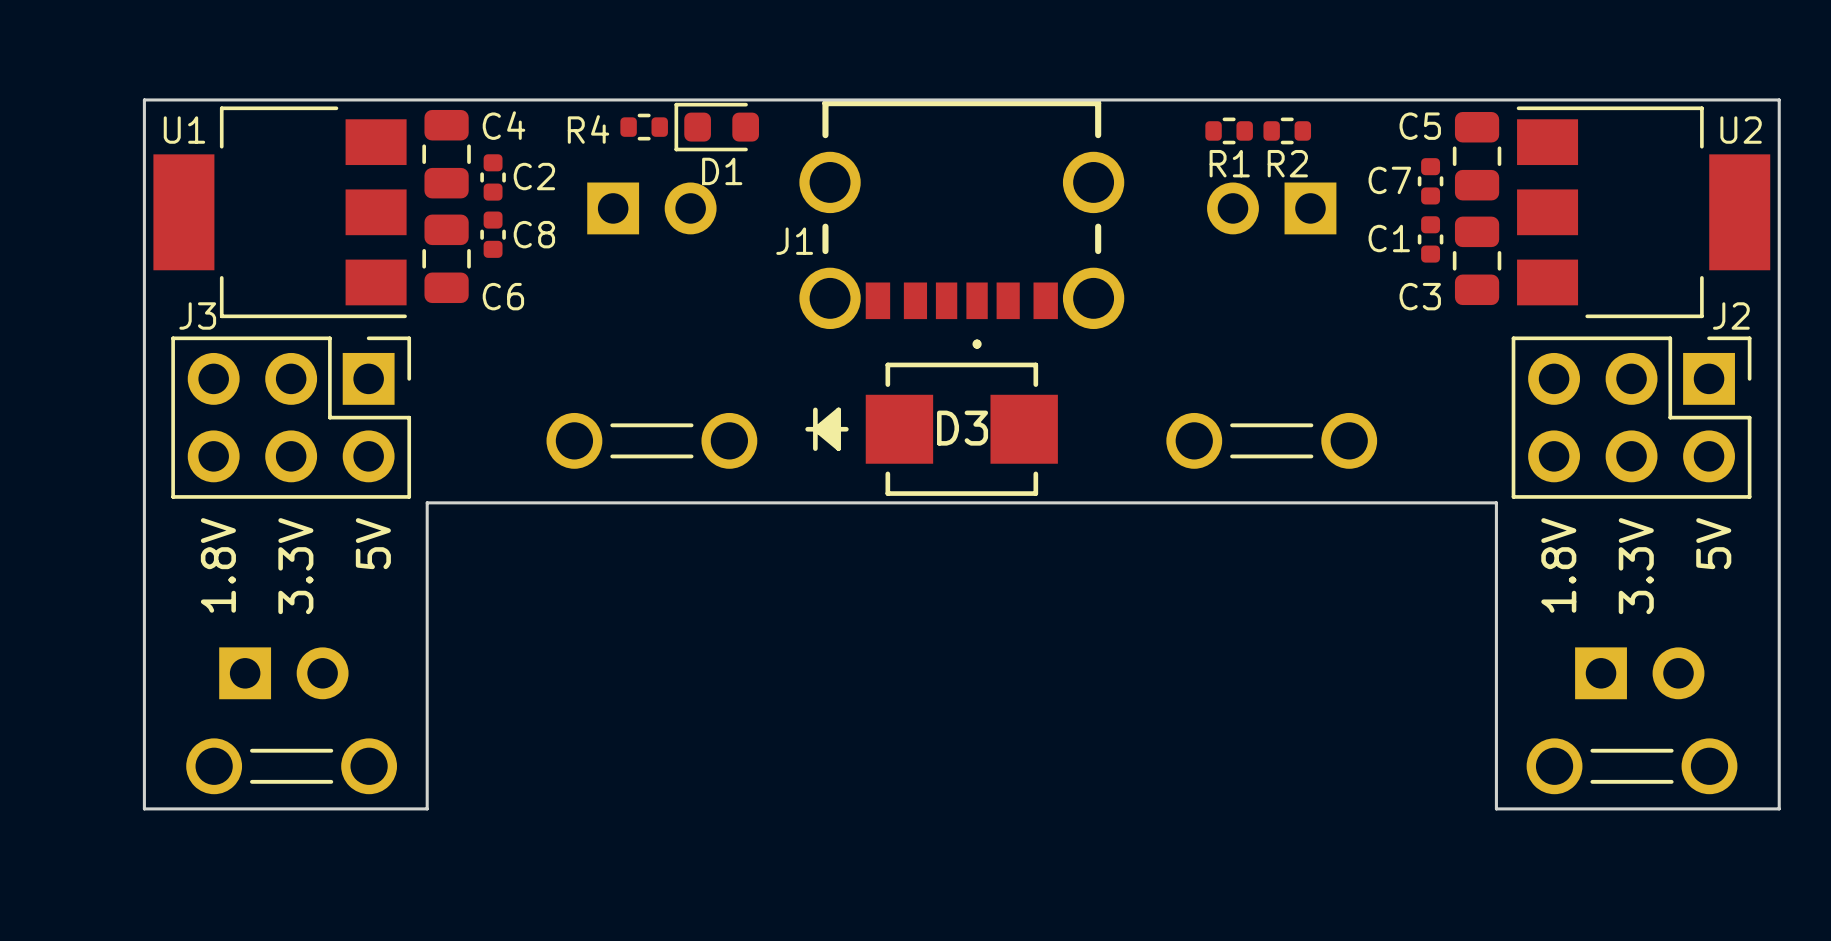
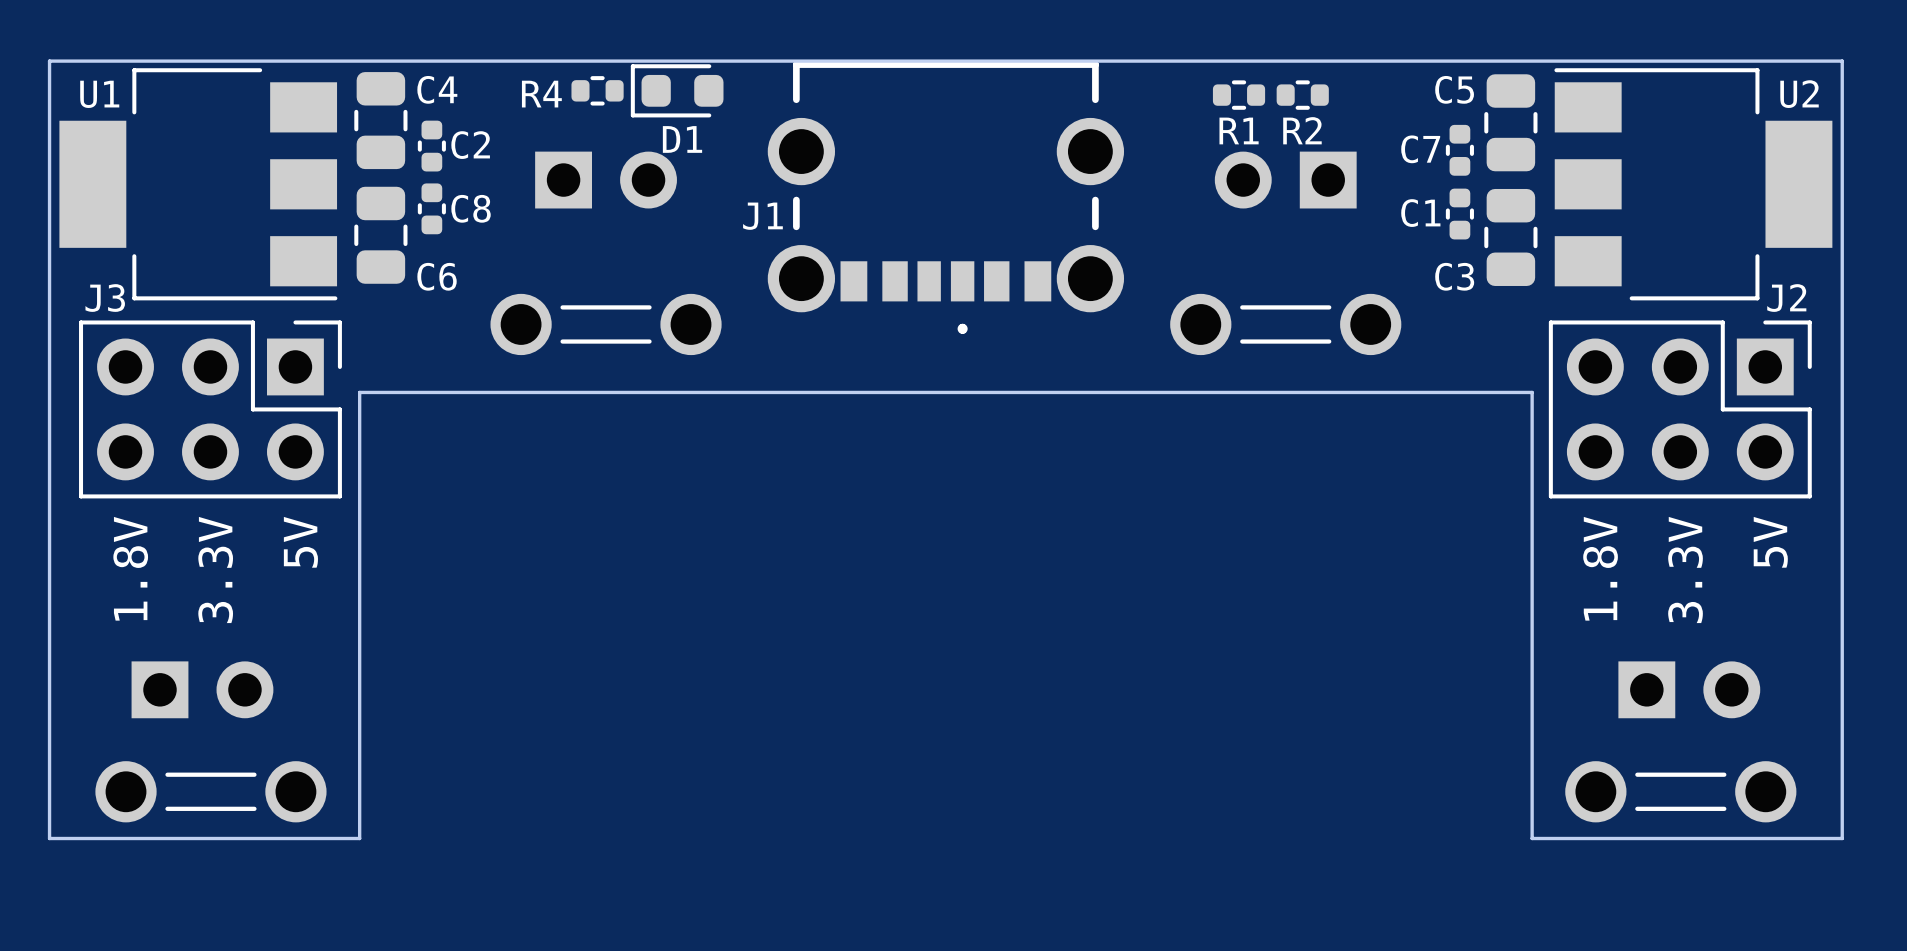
D3: (931, 429) -> none
part position: (651, 440) -> (606, 324)
part position: (1271, 440) -> (1285, 324)
board edge: (427, 502) (1496, 502) -> (359, 502) (359, 392) (1532, 392) (1532, 502)

